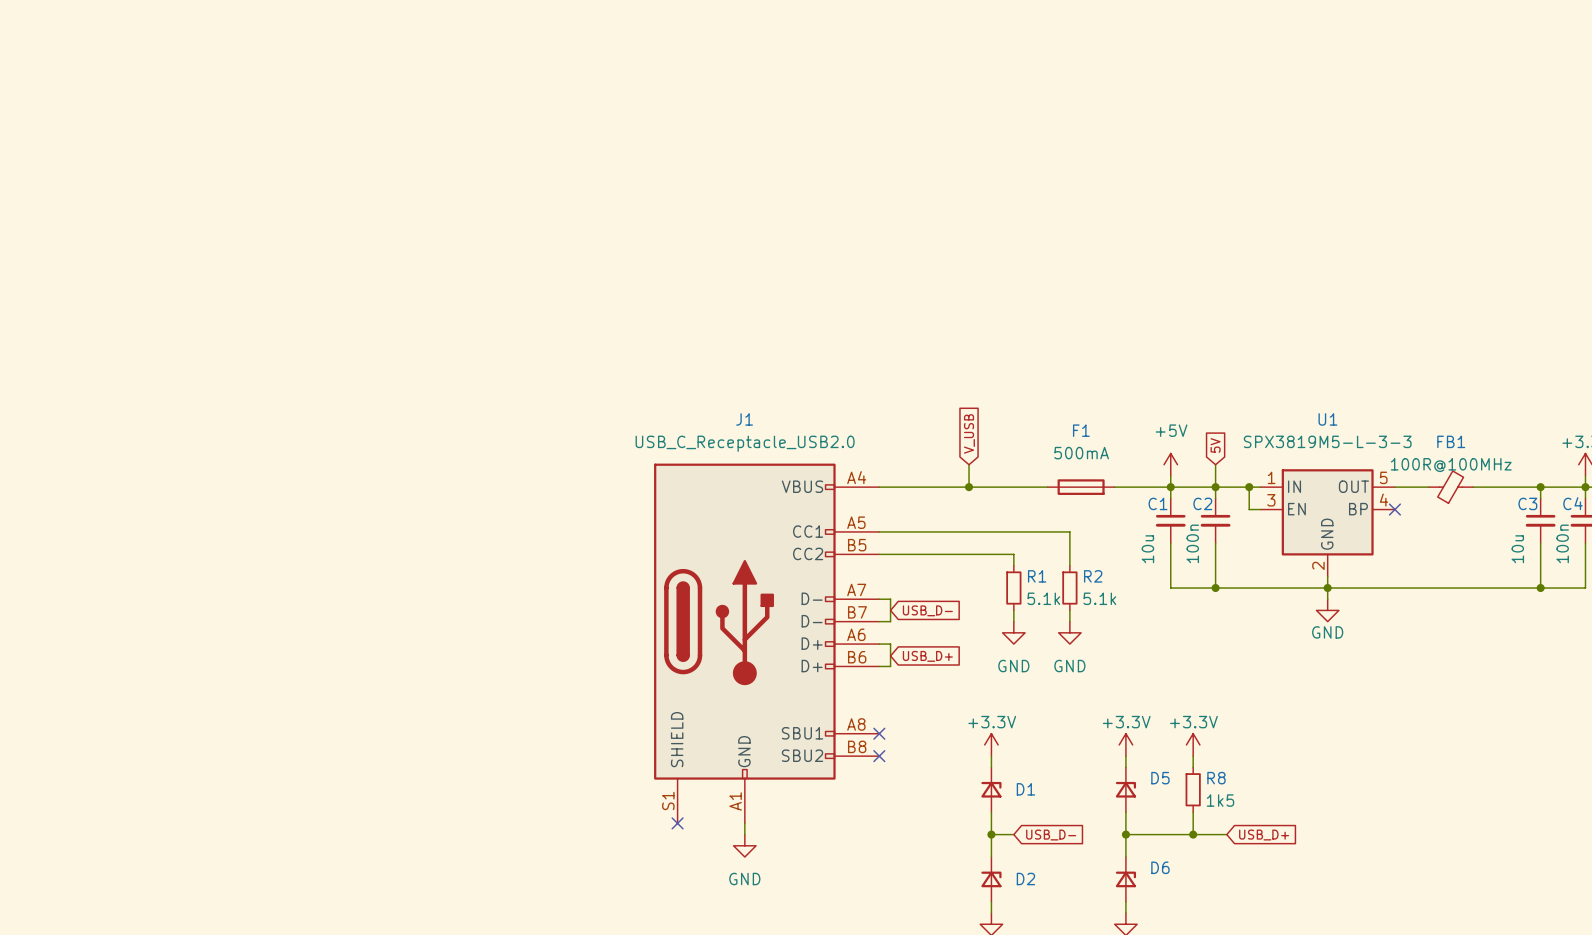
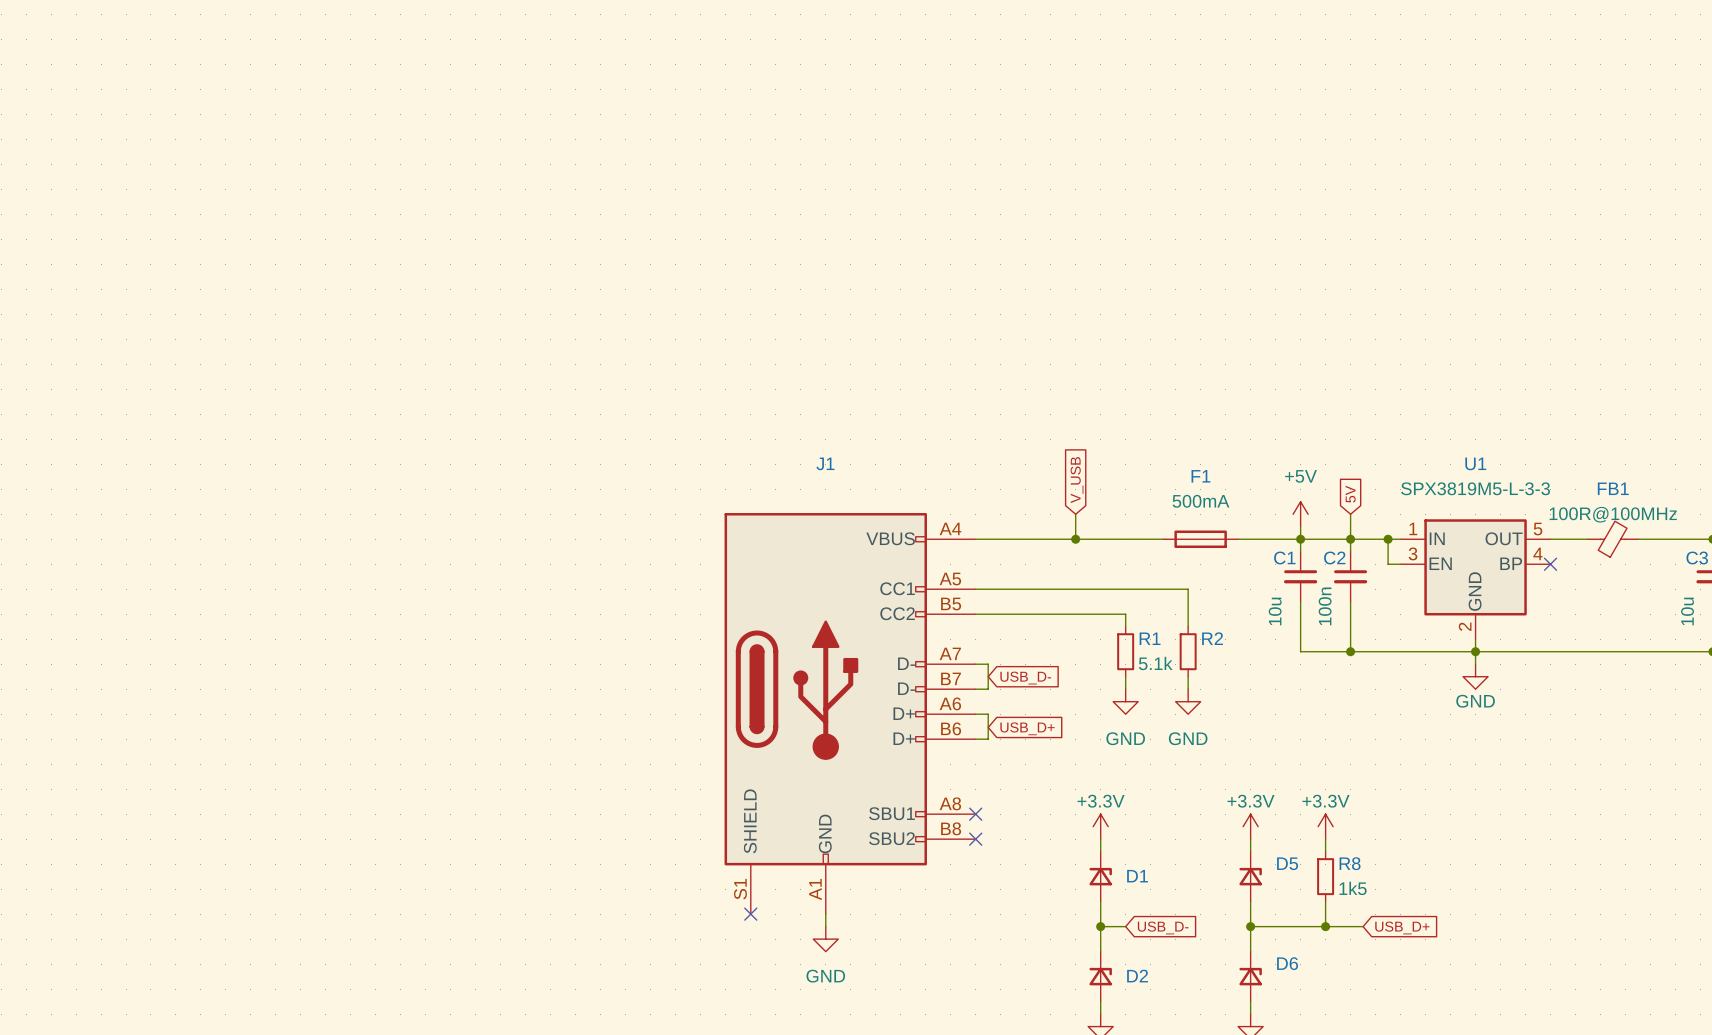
J1 value: USB_C_Receptacle_USB2.0 (745, 443) -> none
R2 value: 5.1k (1099, 598) -> none

